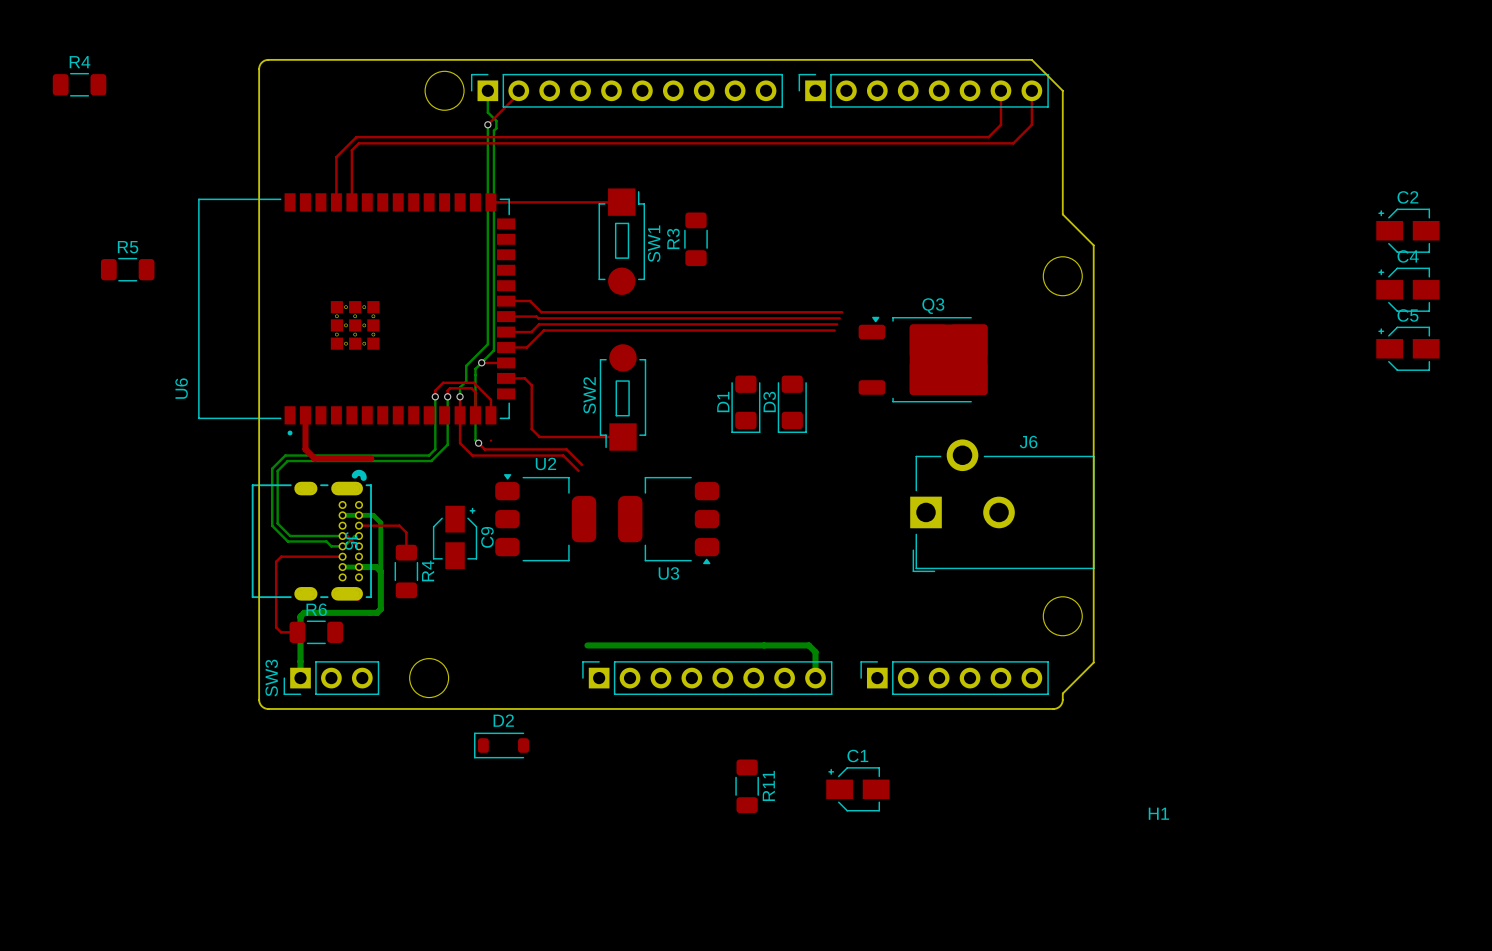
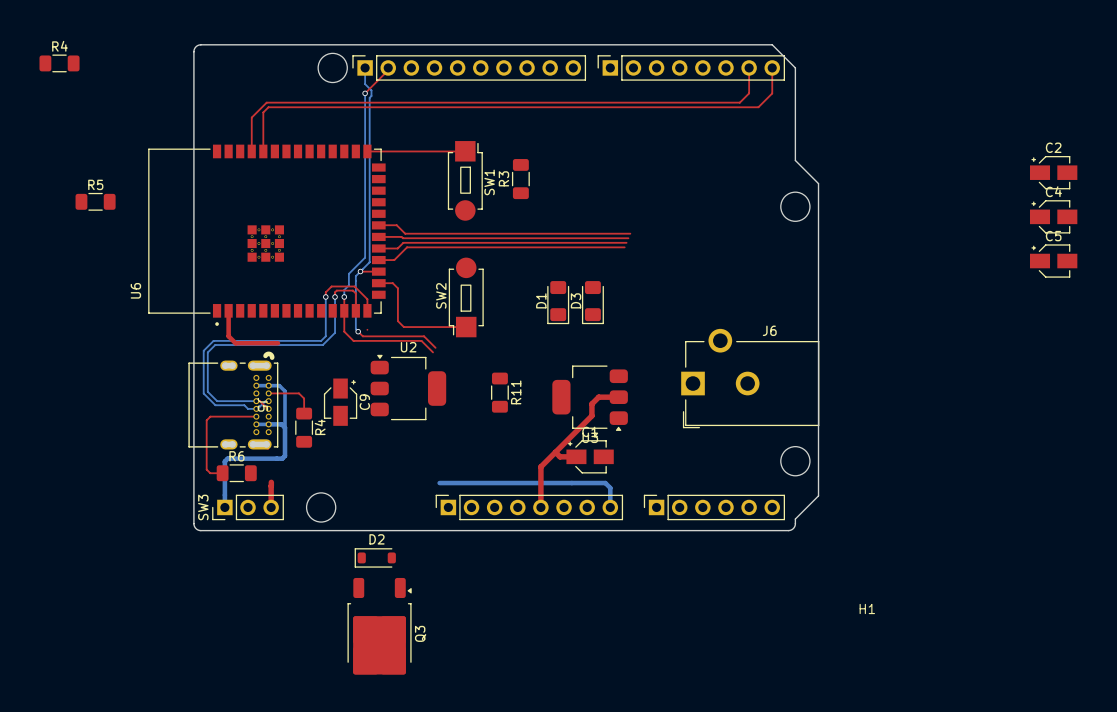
Q3 rotation: 0° (923, 359) -> 90° clockwise (379, 626)
Q3 position: (923, 359) -> (379, 626)
U3 position: (668, 520) -> (590, 398)
top track: none -> (618, 397) (598, 397) (591, 404) (591, 415) (540, 466) (540, 507)
top track: none -> (555, 452) (560, 456) (576, 456)
top track: none -> (271, 482) (271, 507)
R11 position: (747, 786) -> (499, 392)
C1 position: (857, 789) -> (590, 456)

